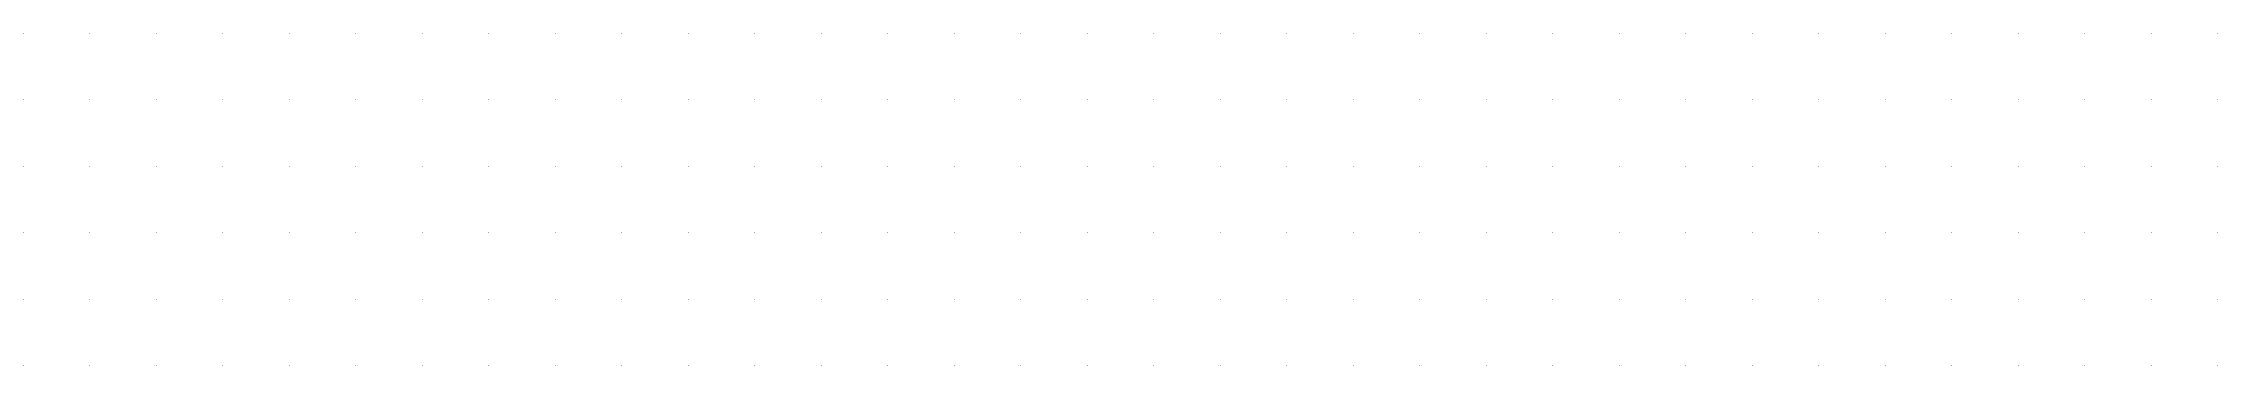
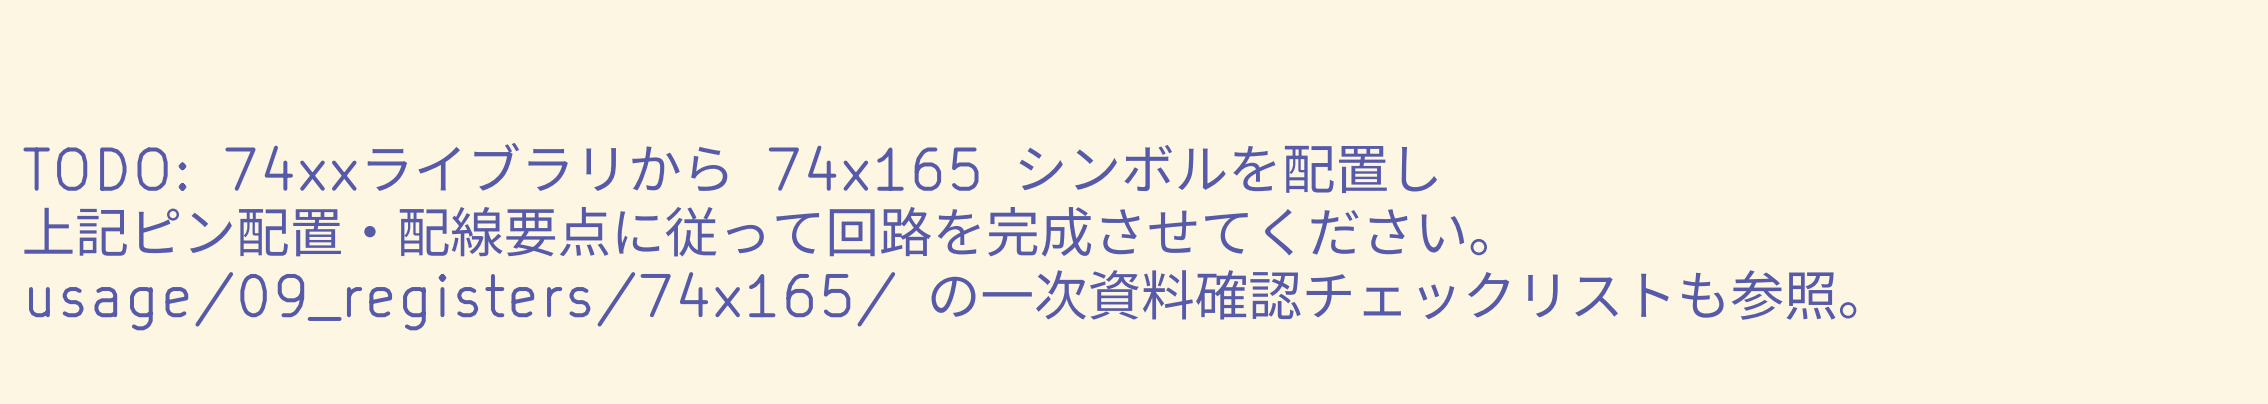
text: none -> TODO: 74xxライブラリから 74x165 シンボルを配置し (731, 167)
text: none -> 上記ピン配置・配線要点に従って回路を完成させてください。 (755, 231)
text: none -> usage/09_registers/74x165/ の一次資料確認チェックリストも参照。 (943, 299)

